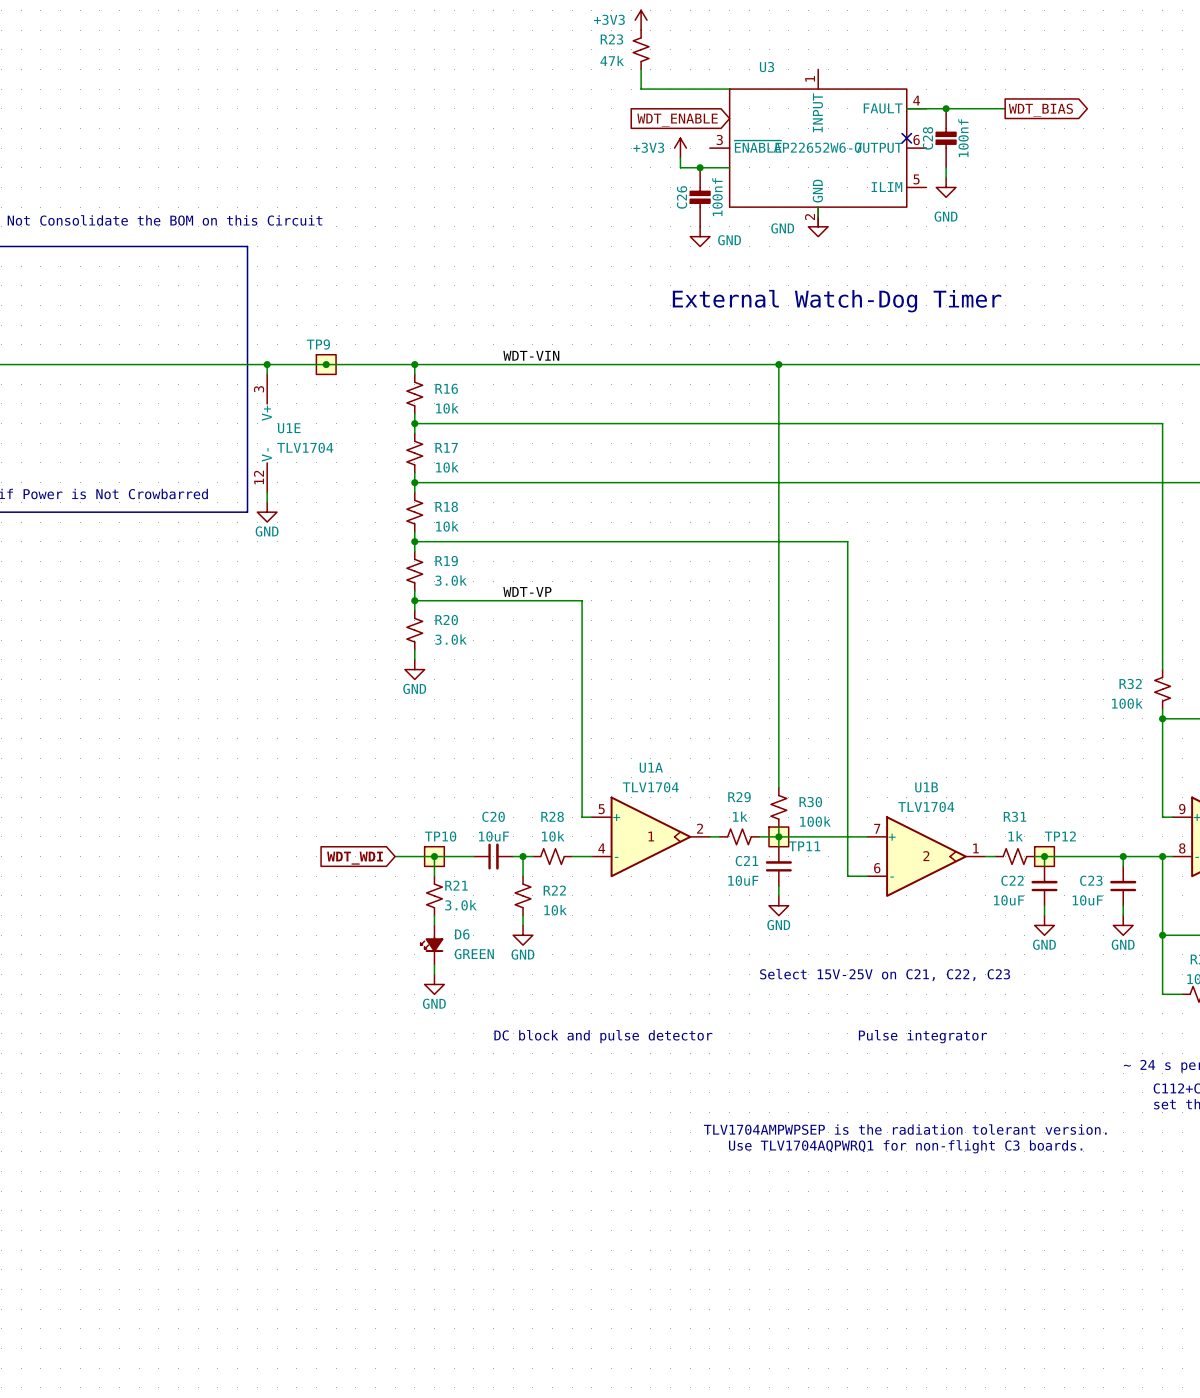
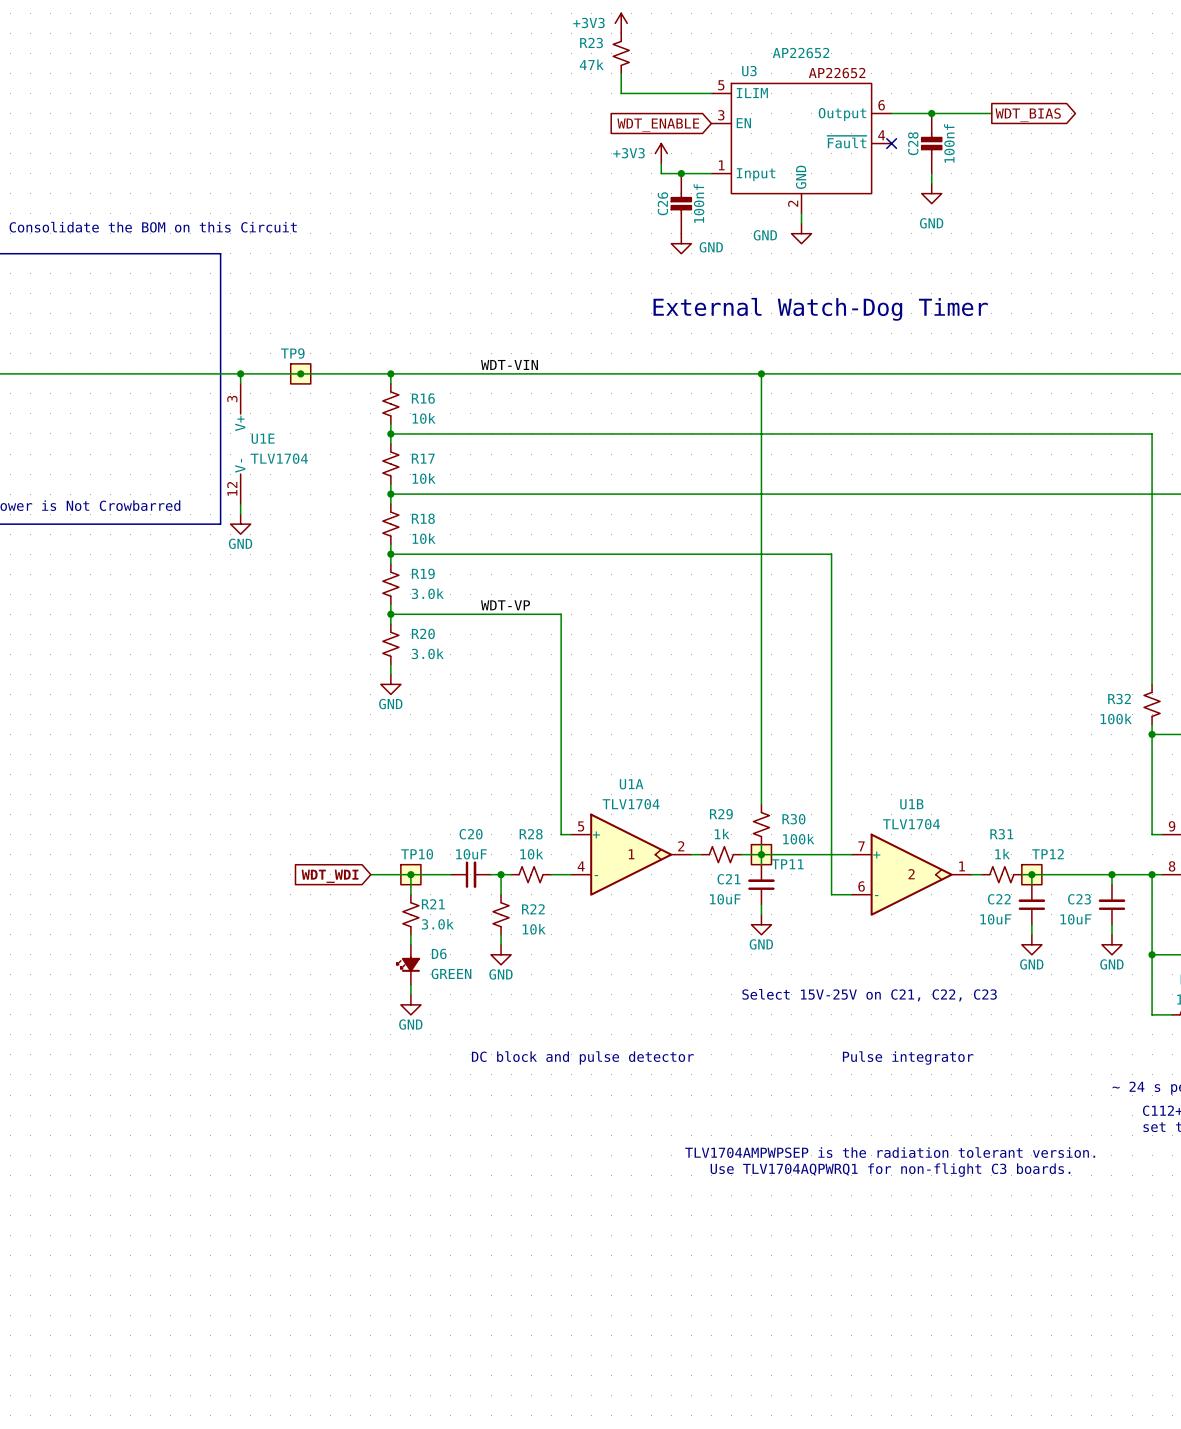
U3 symbol: [709, 69, 927, 227] -> [711, 83, 892, 214]
U3 value: AP22652W6-7 (817, 147) -> AP22652 (801, 53)

